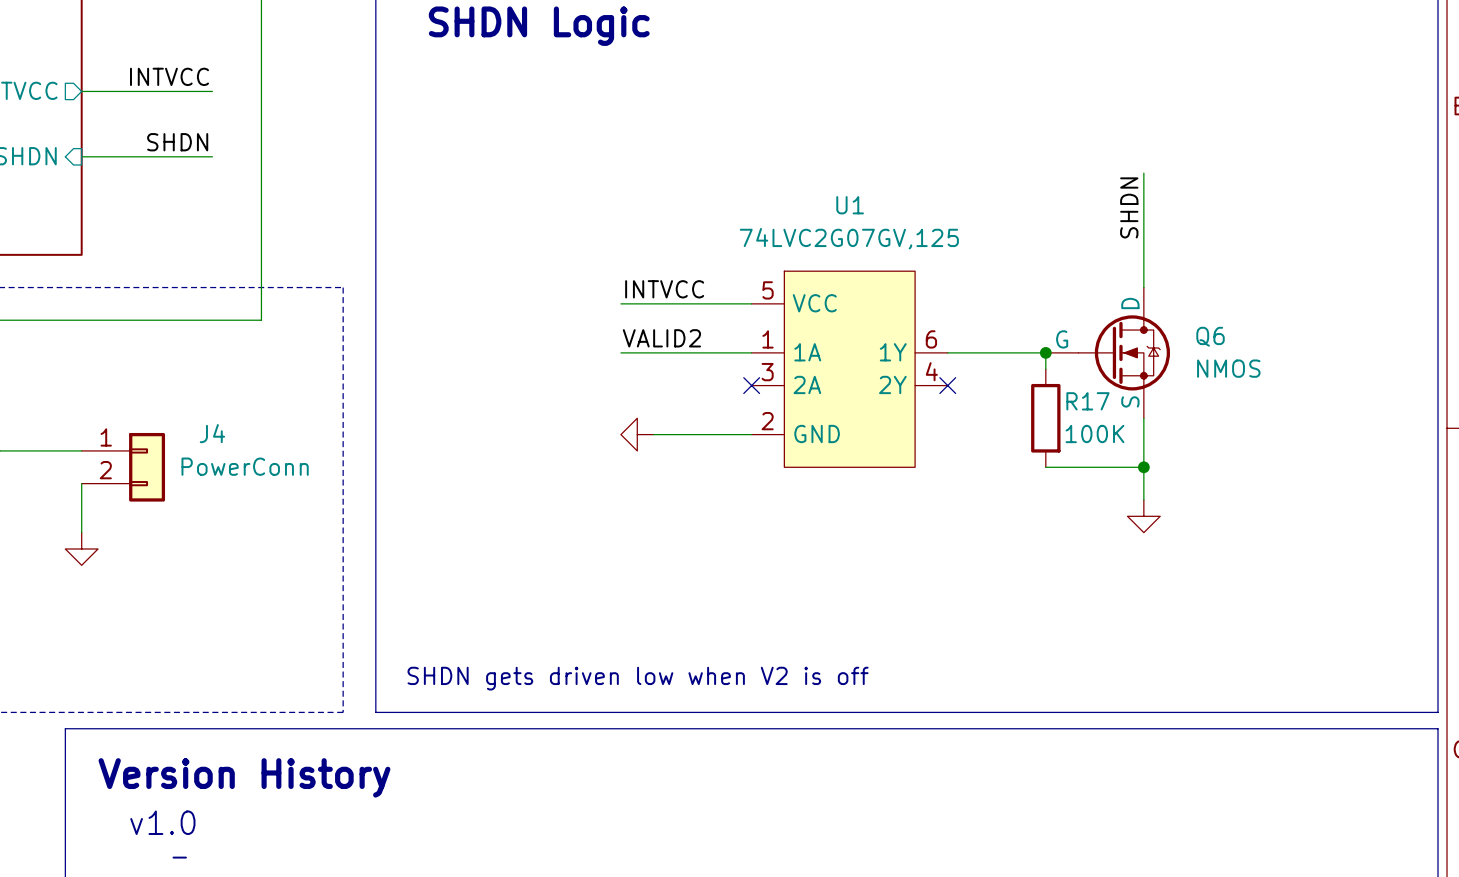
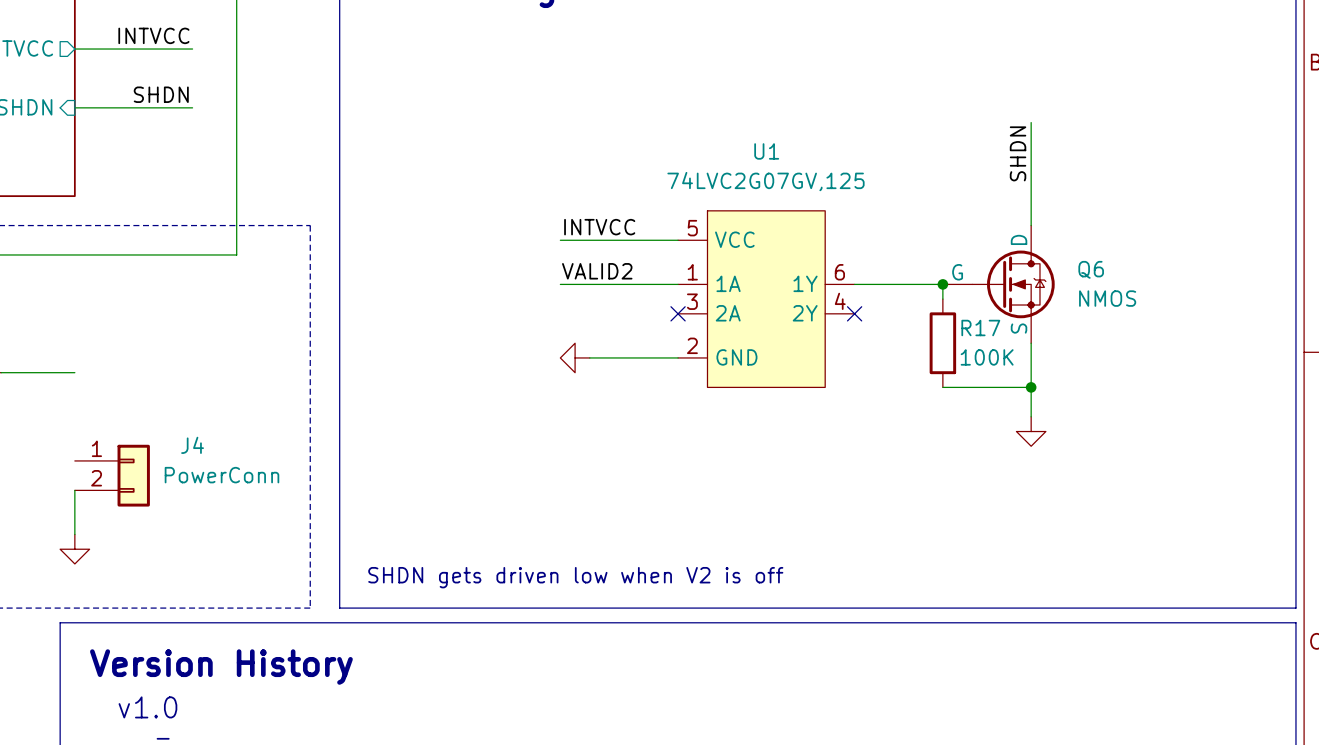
J4 position: (123, 467) -> (112, 475)
wire: (81, 483) (81, 532) -> (74, 490) (74, 534)
power symbol position: (81, 548) -> (74, 549)

